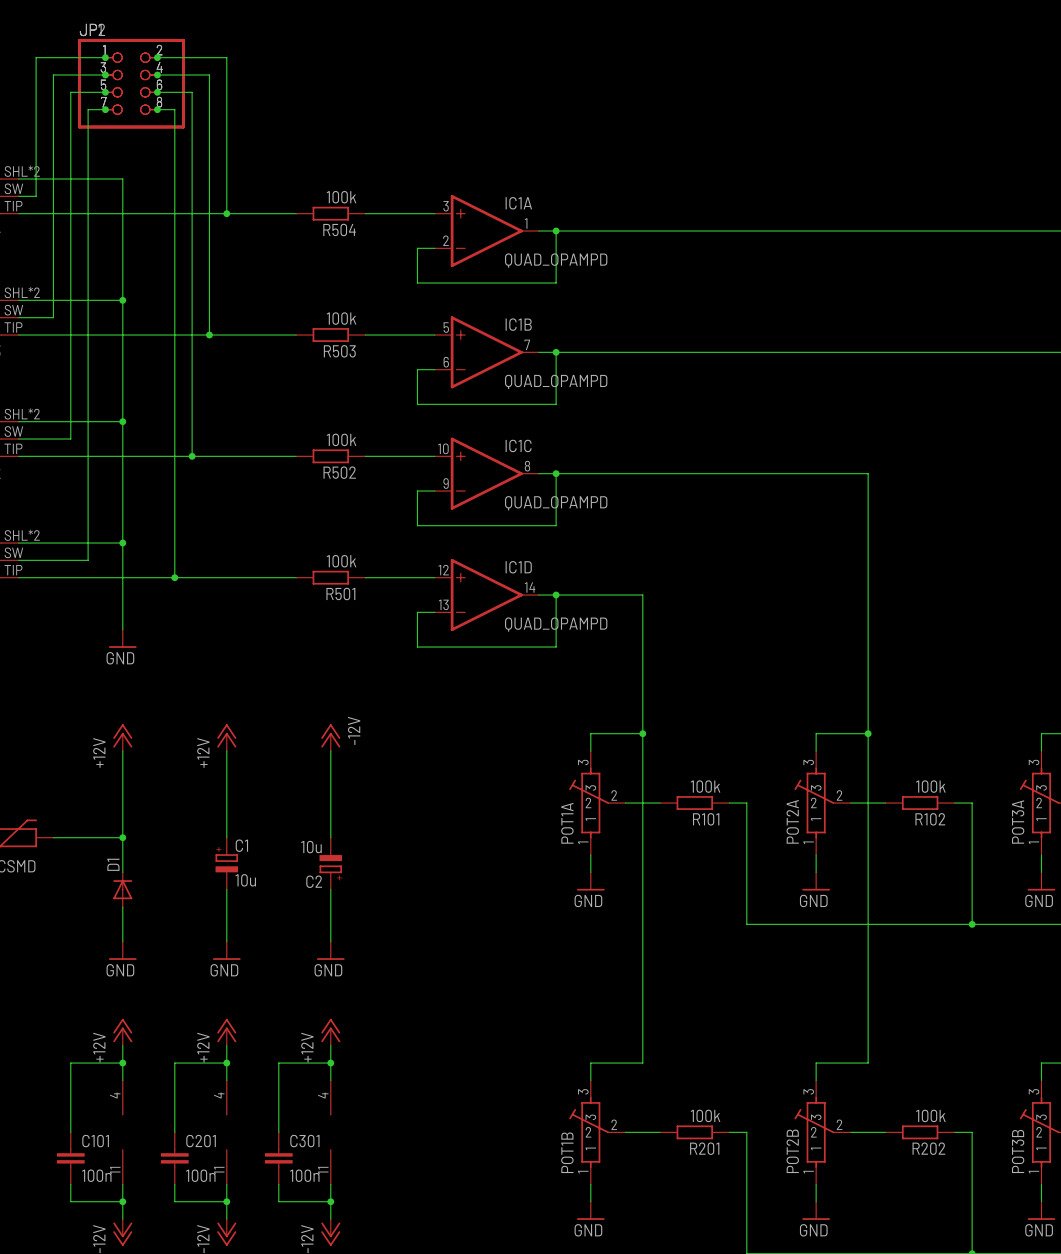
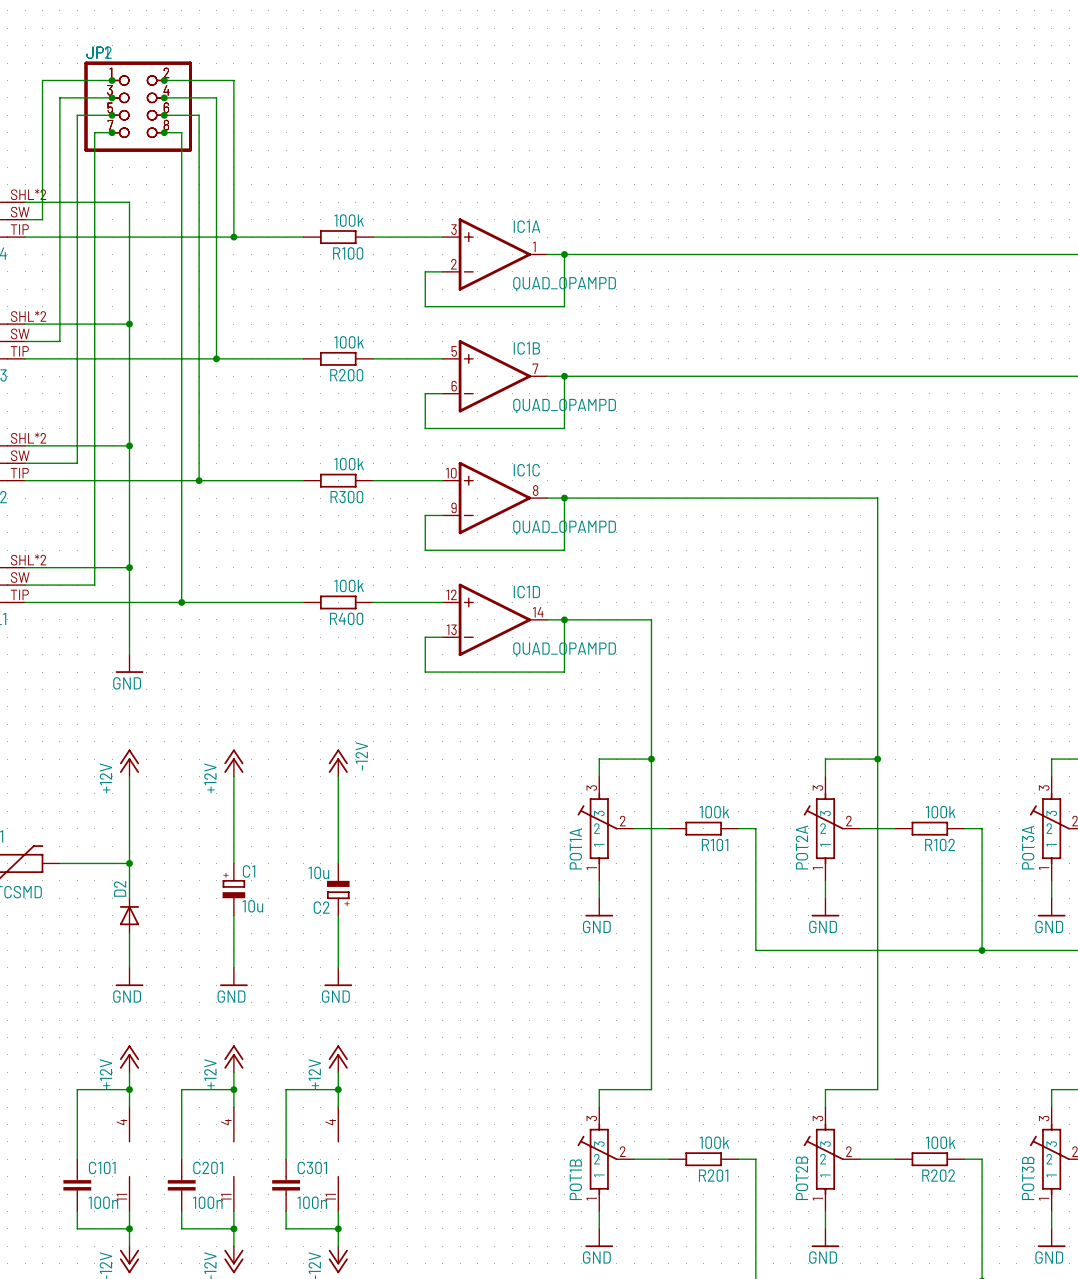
R504 name: R504 (339, 229) -> R100 (348, 253)
R503 name: R503 (339, 351) -> R200 (346, 375)
R502 name: R502 (339, 472) -> R300 (346, 497)
R501 name: R501 (340, 593) -> R400 (346, 618)
D1 name: D1 (113, 864) -> D2 (120, 888)

